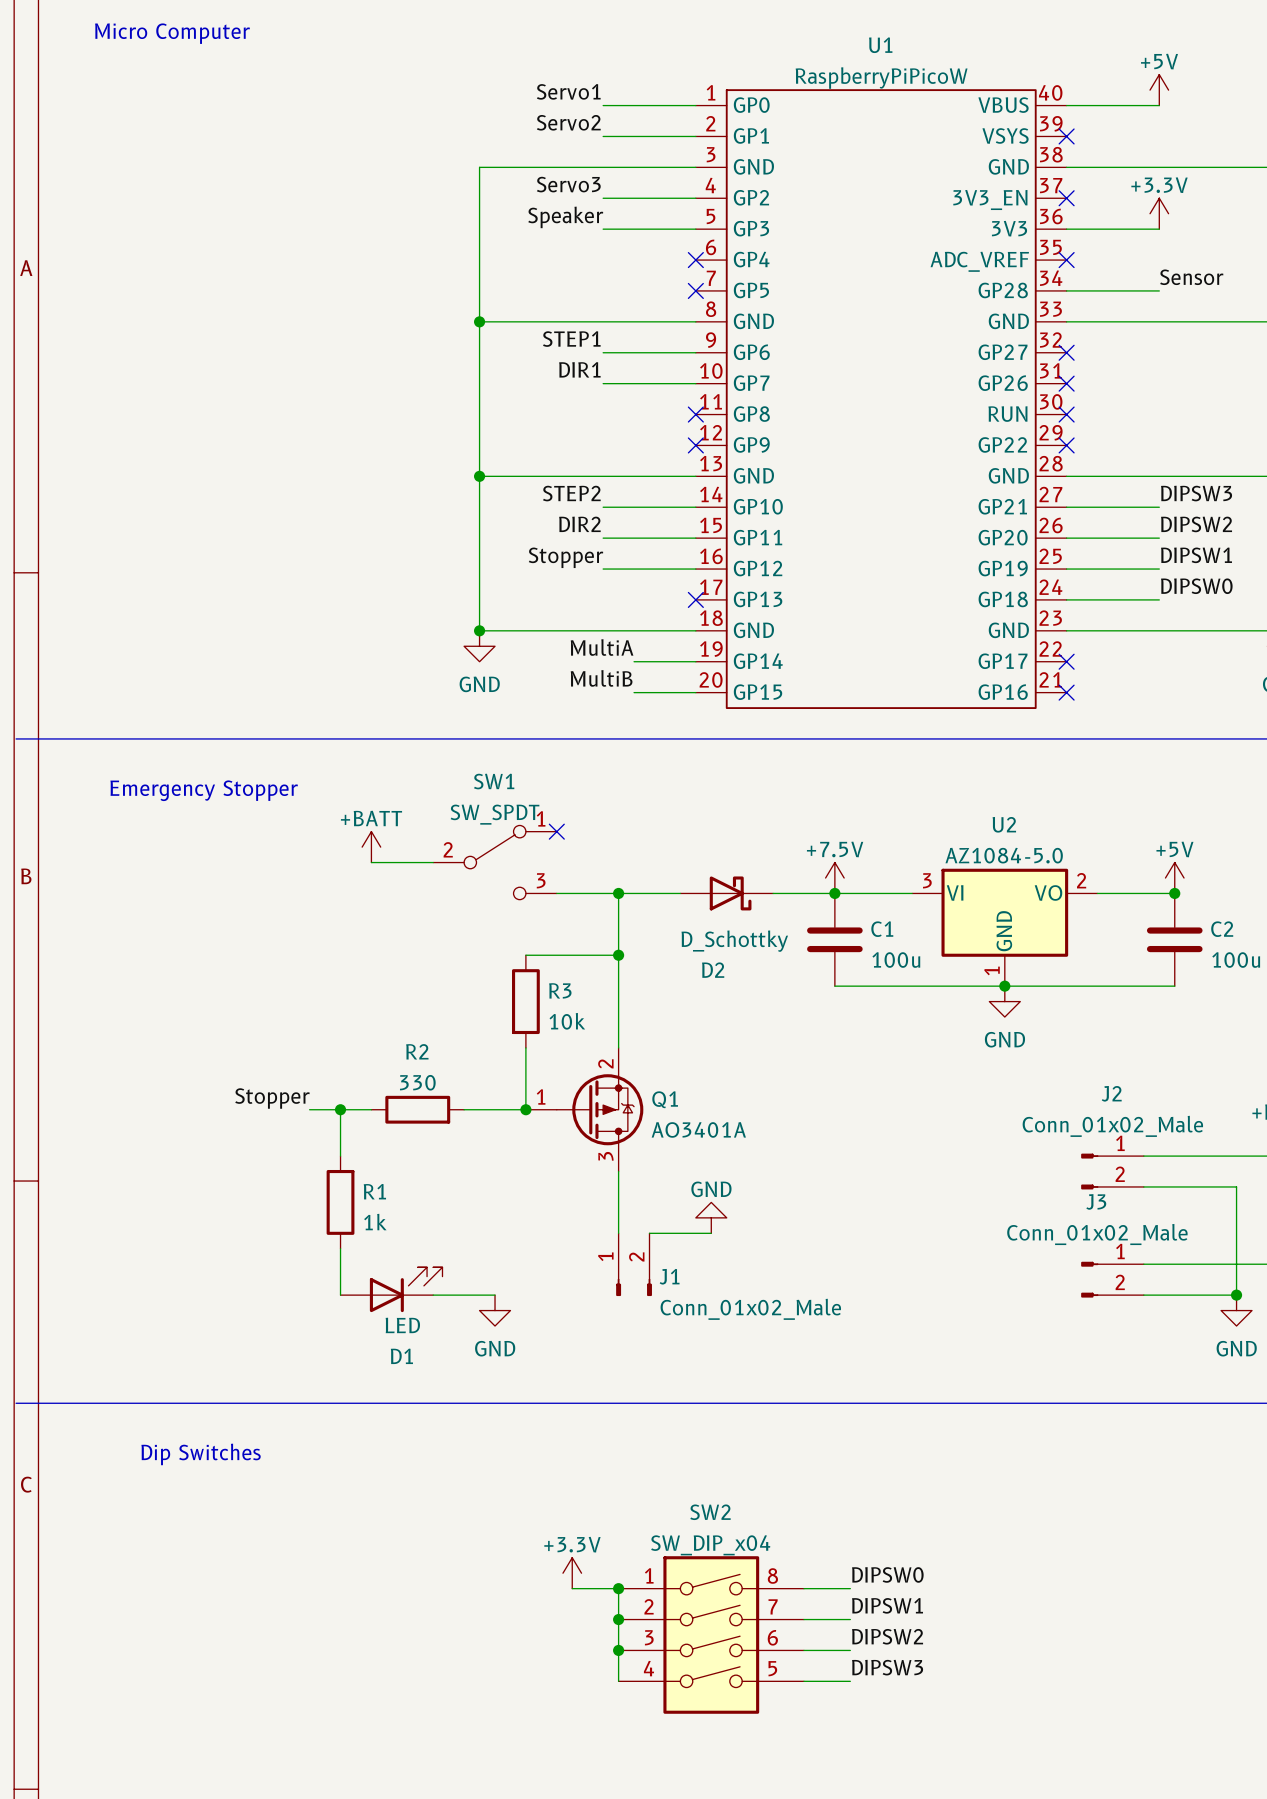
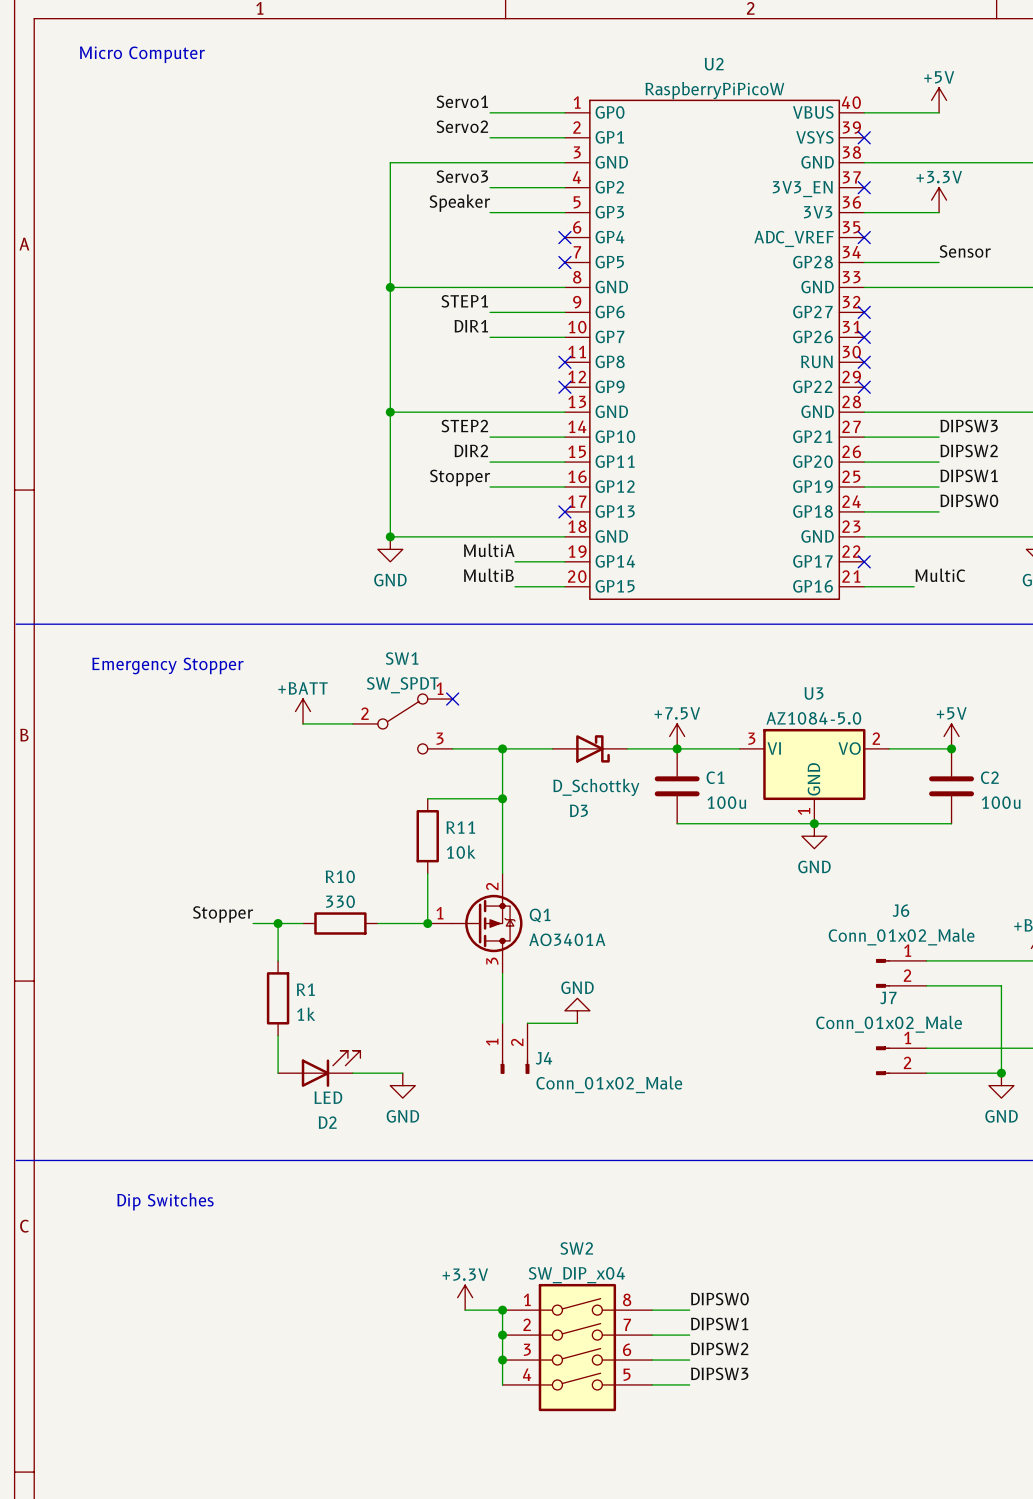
U1 name: U1 (880, 45) -> U2 (714, 64)
label: none -> MultiC (940, 575)
wire: none -> (864, 586) (914, 586)
no-connect mark: (1066, 692) -> none
U2 name: U2 (1004, 824) -> U3 (813, 693)
D2 name: D2 (713, 970) -> D3 (578, 810)
R3 name: R3 (560, 990) -> R11 (460, 827)
R2 name: R2 (417, 1051) -> R10 (340, 876)
J2 name: J2 (1111, 1093) -> J6 (900, 910)
J3 name: J3 (1096, 1201) -> J7 (888, 997)
J1 name: J1 (669, 1276) -> J4 (543, 1058)
D1 name: D1 (401, 1356) -> D2 (327, 1122)

